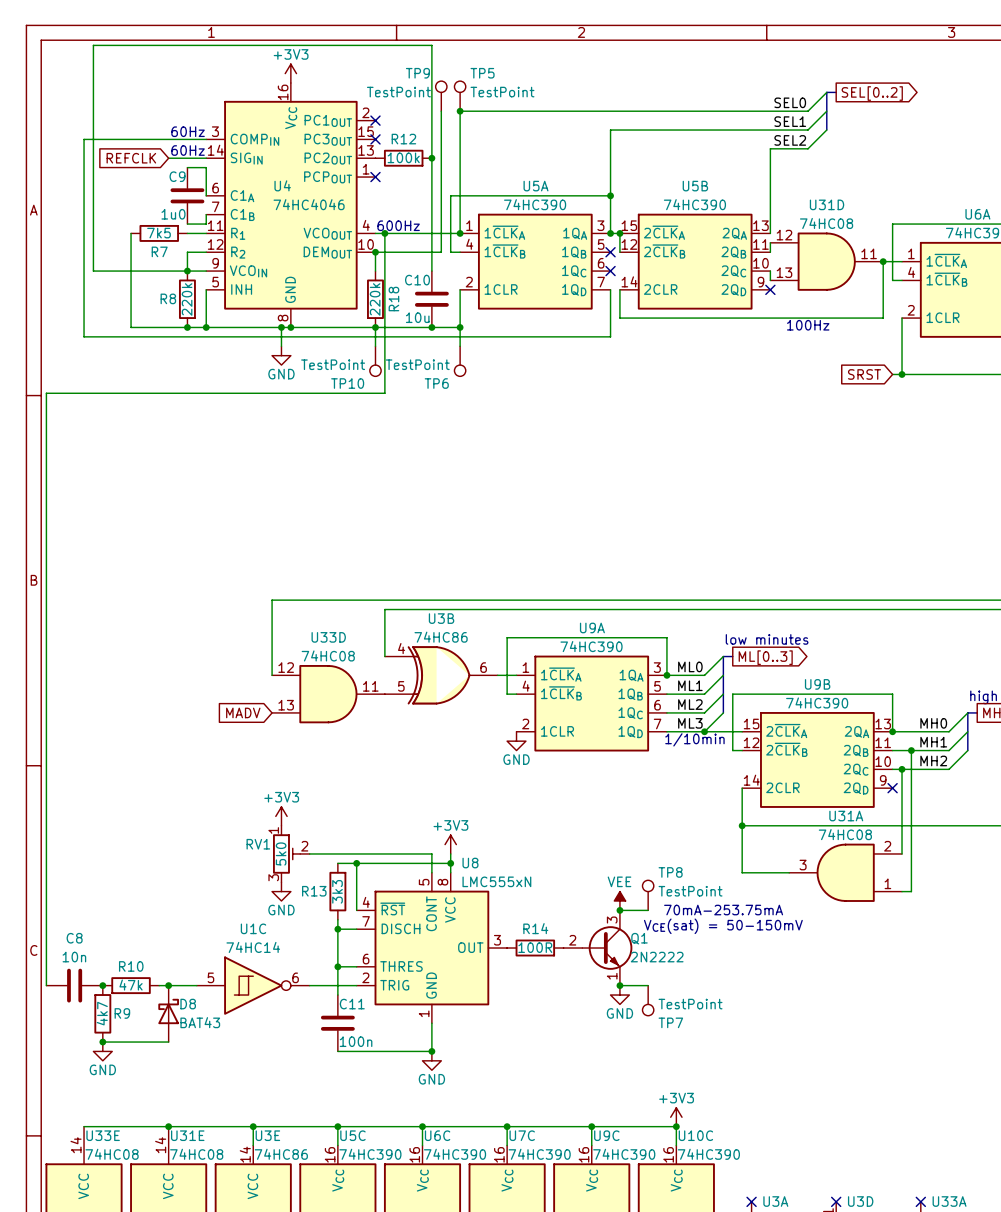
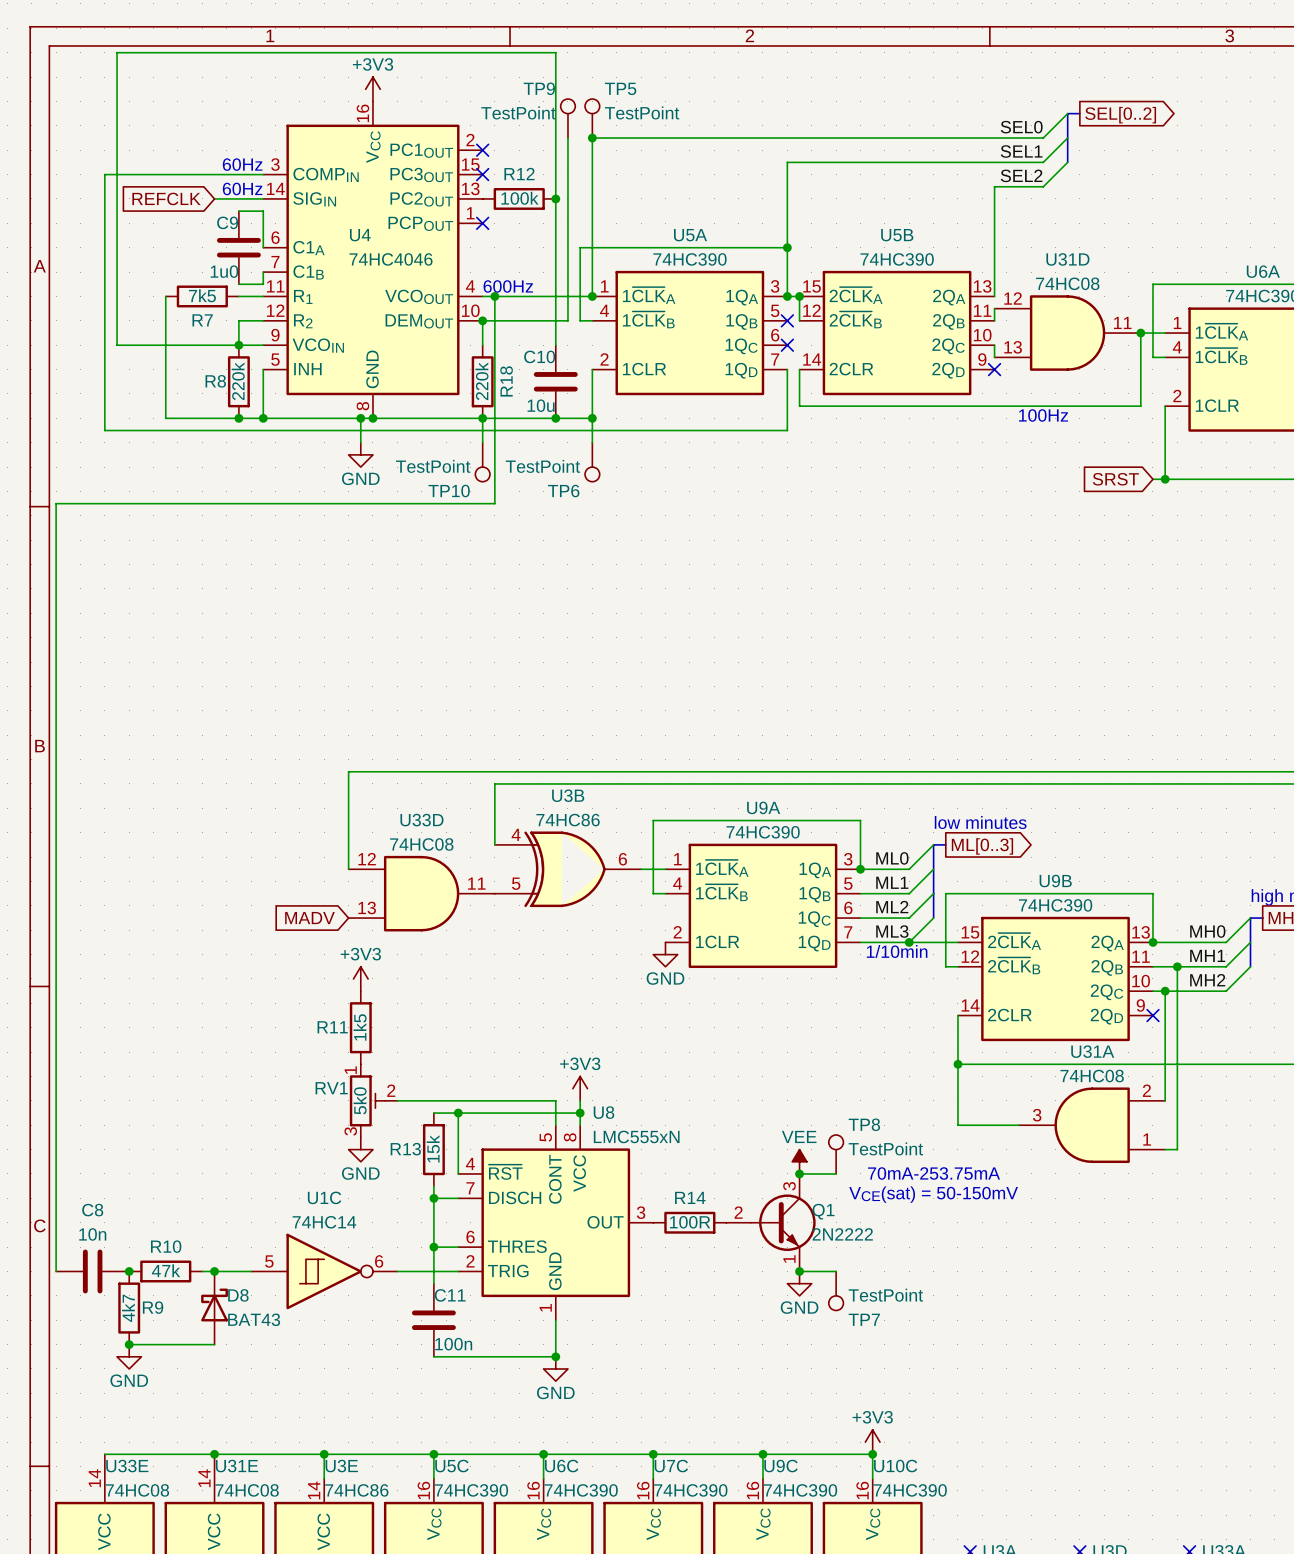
R11: none -> 1k5 (360, 1027)
power symbol position: +3V3 (281, 816) -> +3V3 (360, 978)
R13 value: 3k3 (337, 891) -> 15k (433, 1148)

